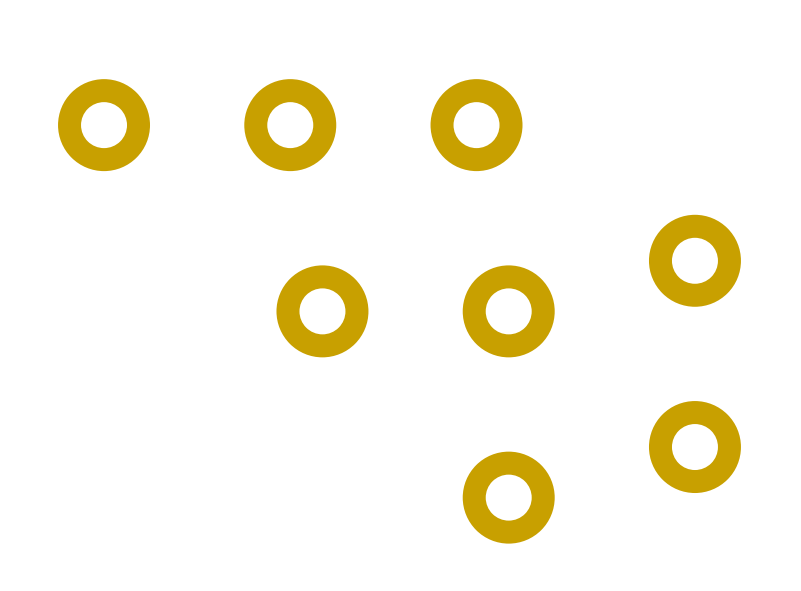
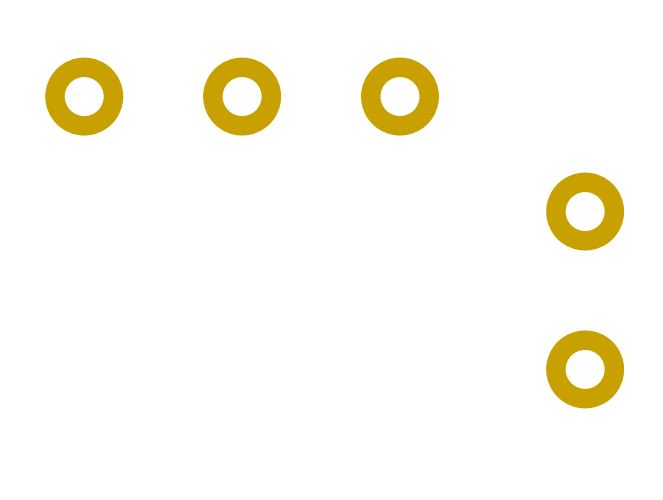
part: (322, 311) -> none
part: (508, 311) -> none
part: (508, 497) -> none

